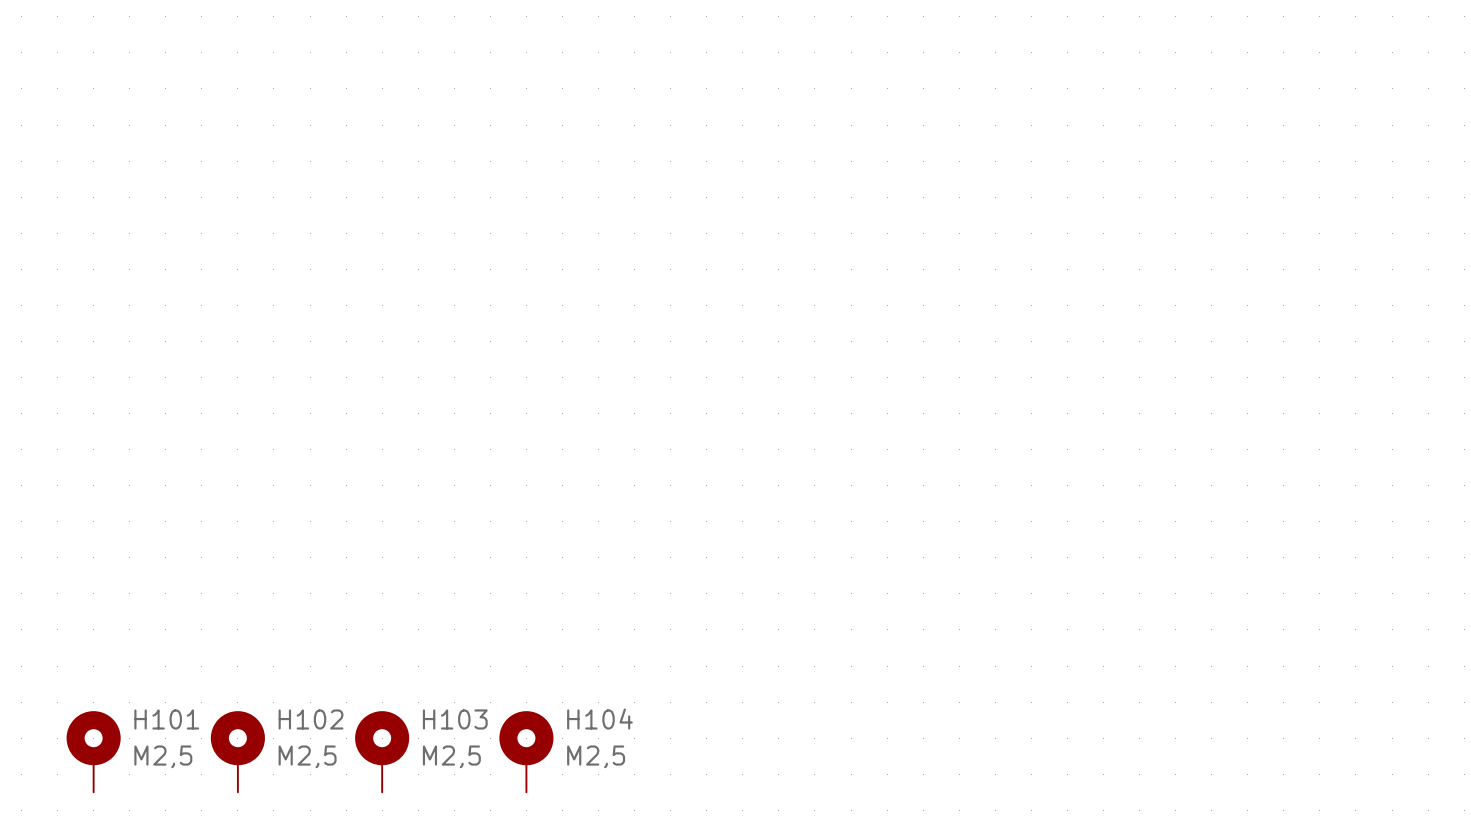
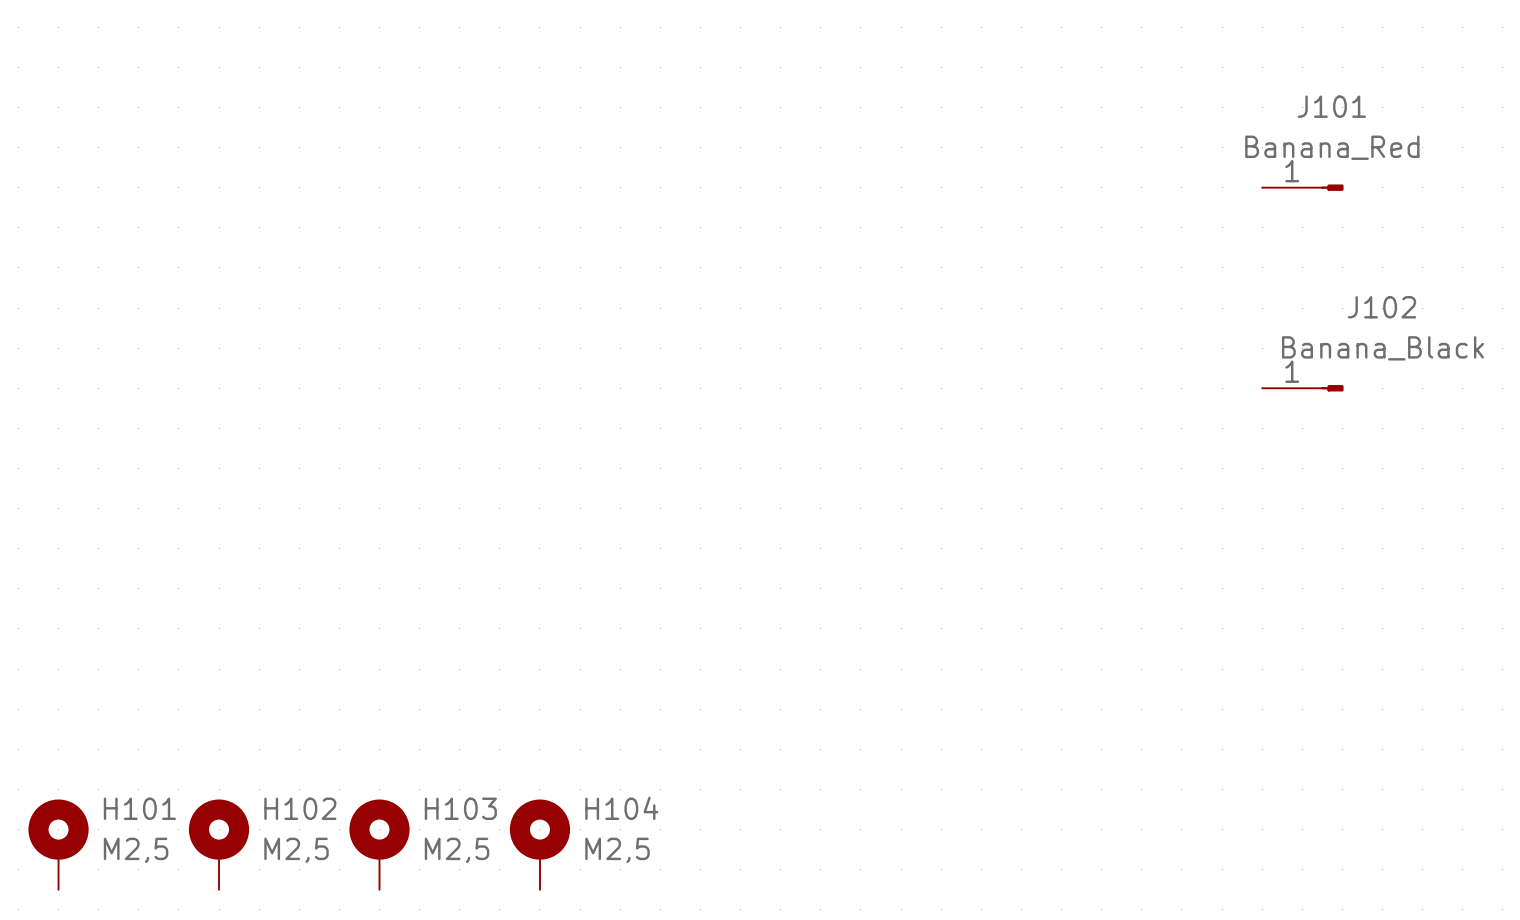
J101: none -> Banana_Red (1302, 187)
J102: none -> Banana_Black (1302, 388)

